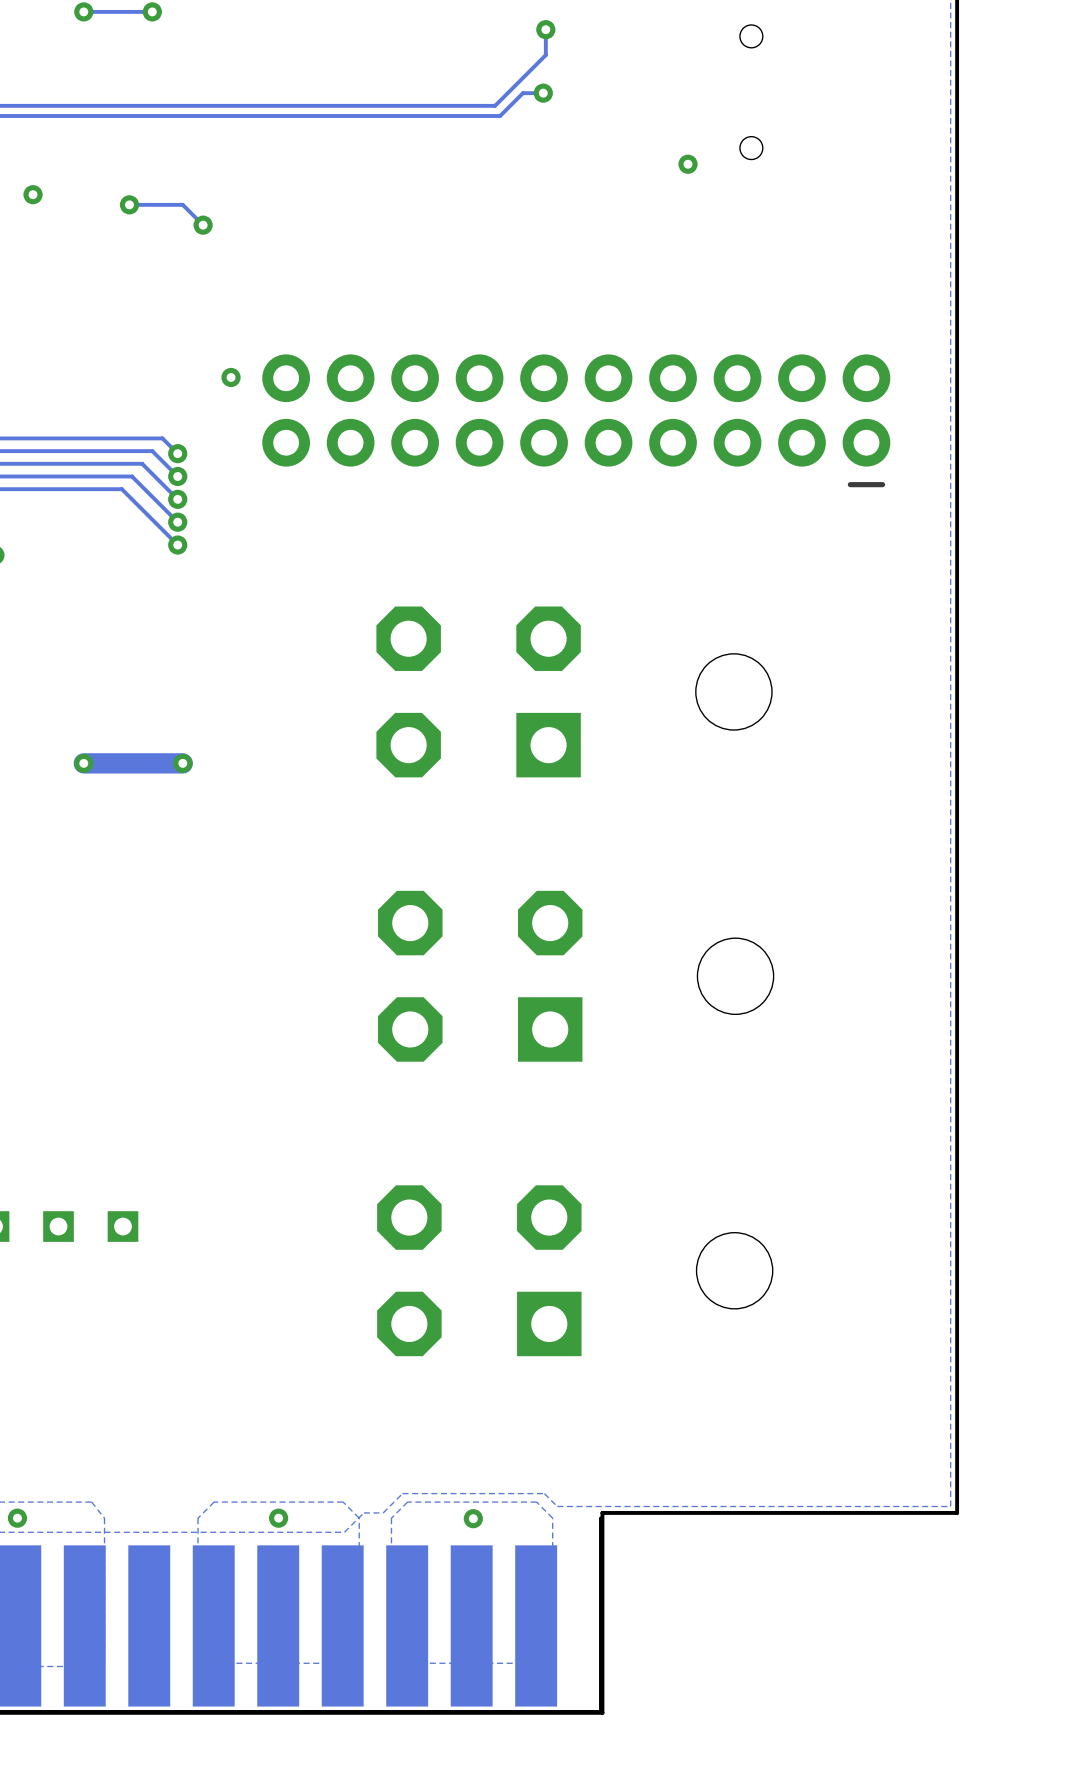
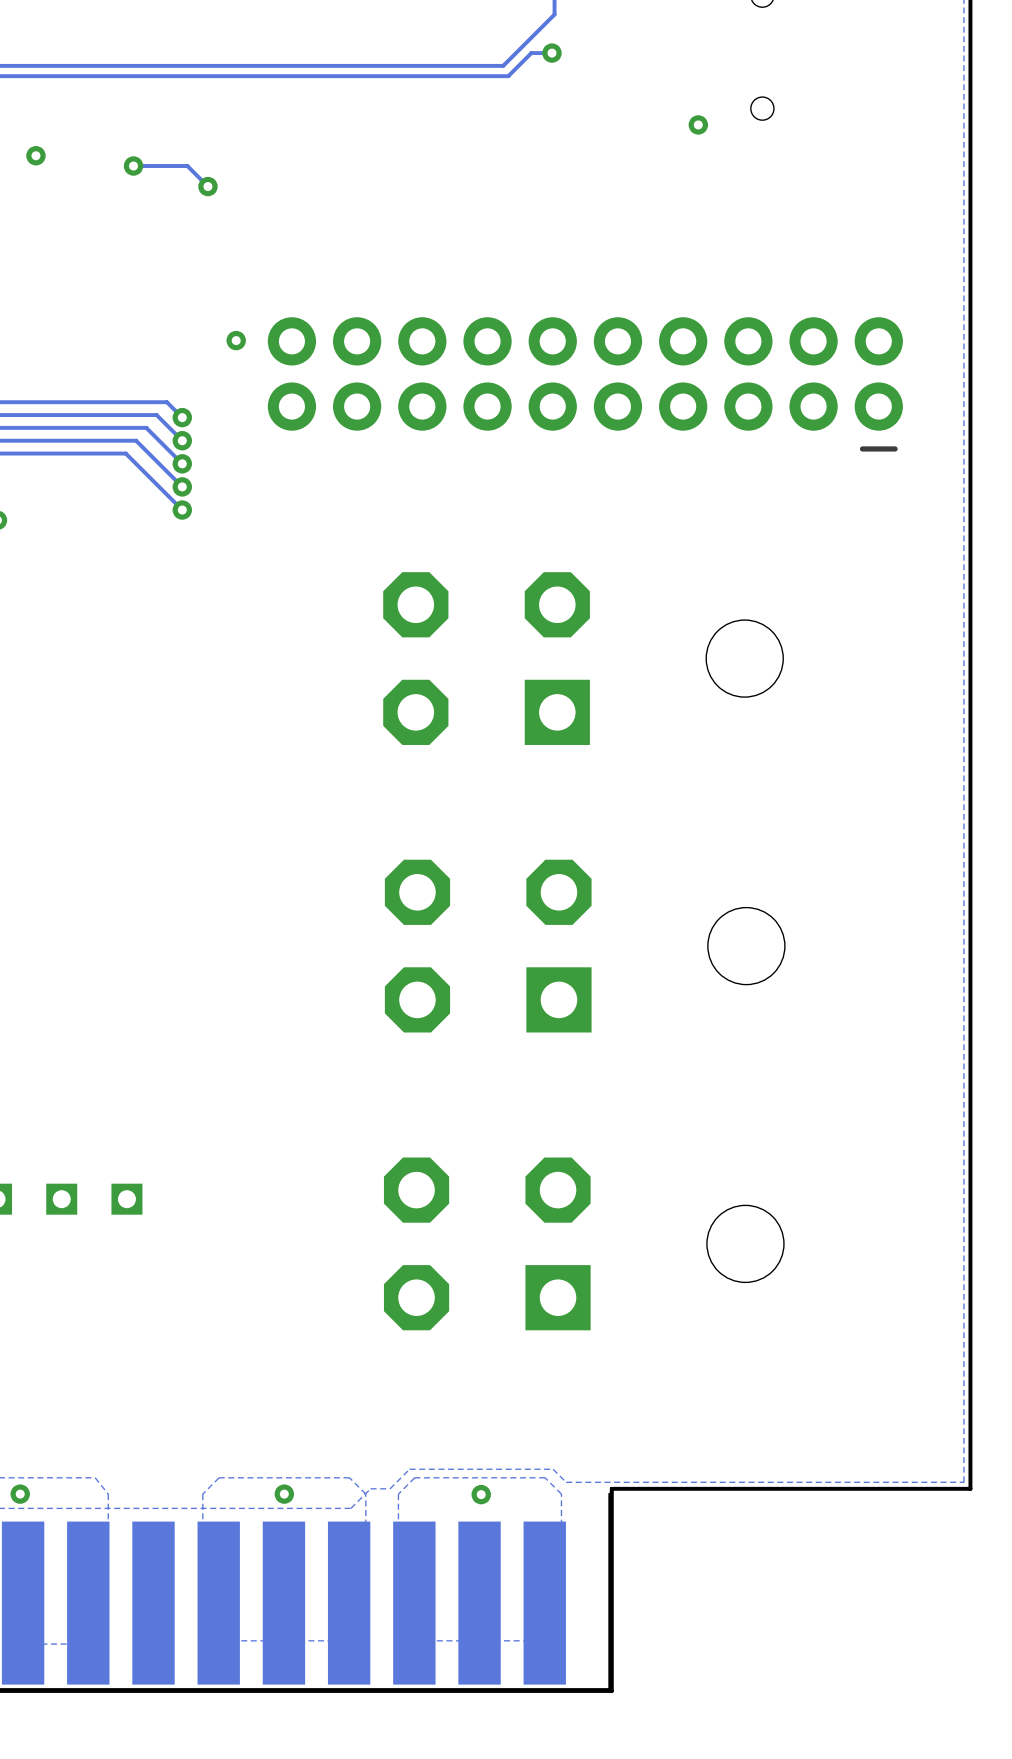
via: (83, 763) -> none
track: (182, 763) (83, 763) -> none
via: (182, 763) -> none

